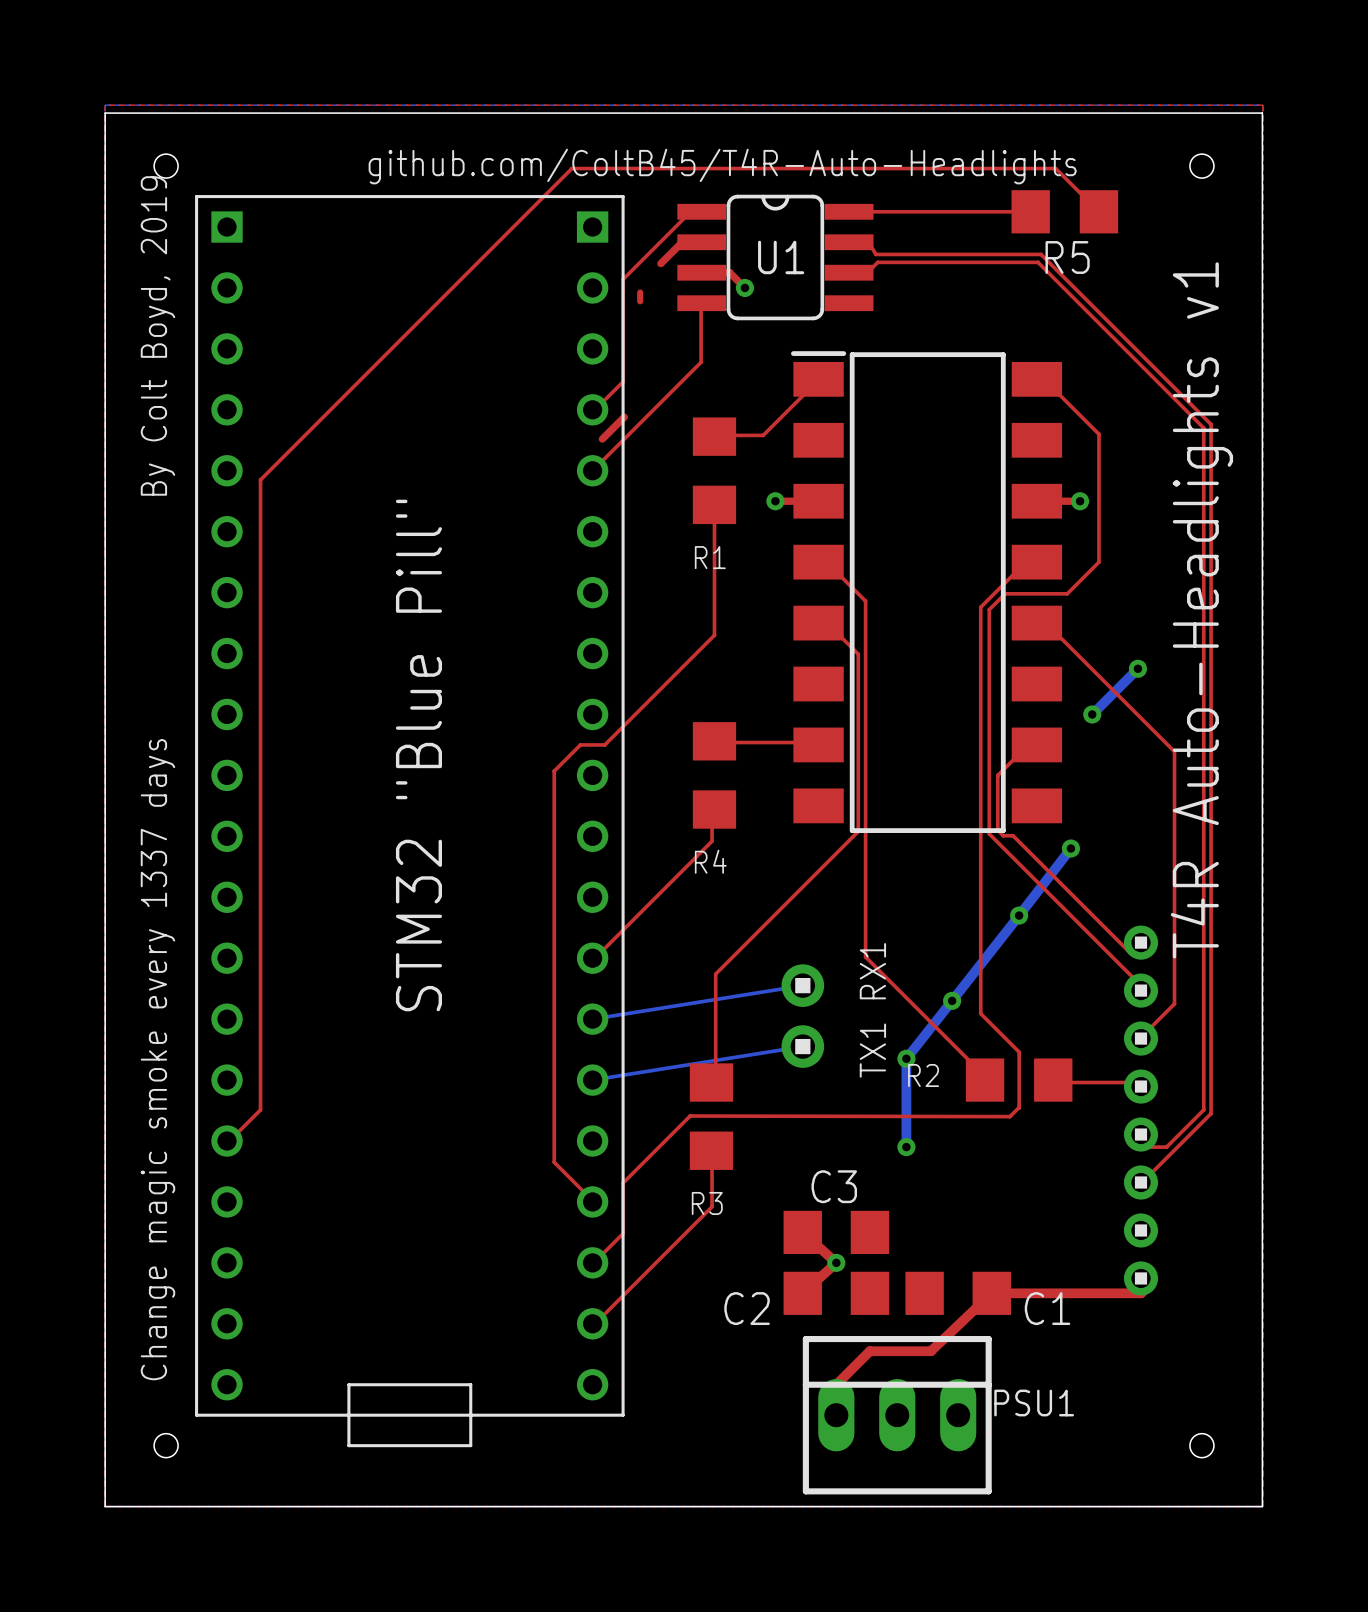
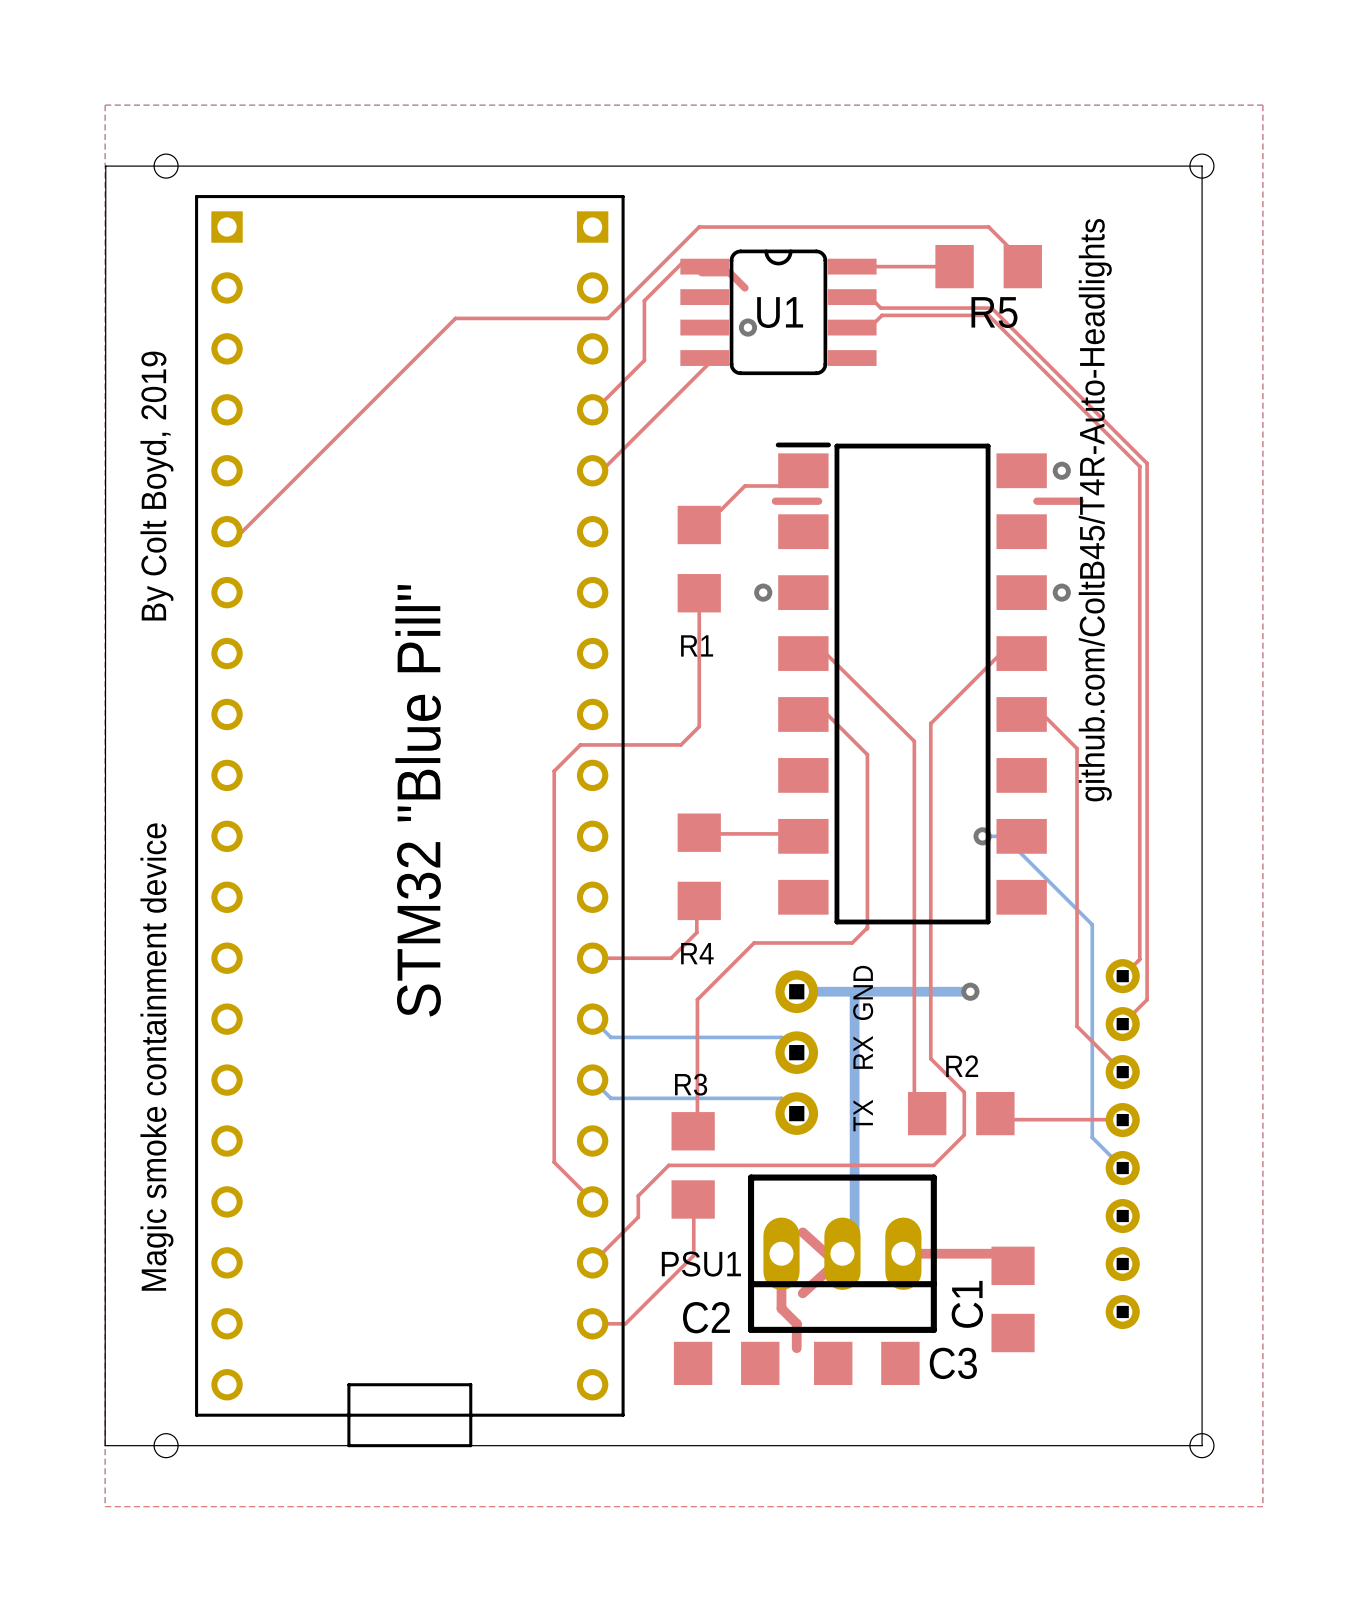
board edge: (105, 113) (1262, 113) (1262, 1506) (105, 1506) (105, 113) -> (105, 166) (105, 1445) (1202, 1445) (1202, 166) (105, 166)
text: github.com/ColtB45/T4R-Auto-Headlights (722, 166) -> none
top track: (701, 211) (690, 212) (623, 279) (623, 381) -> (704, 266) (686, 266) (682, 262) (644, 300) (644, 360) (623, 381)
top track: (849, 211) (1030, 211) -> none
R5 position: (1064, 211) -> (988, 266)
top track: (1098, 211) (1055, 168) (571, 168) (260, 479) (260, 1109) (229, 1141) (227, 1141) -> none
top track: (690, 242) (701, 242) (682, 242) (660, 263) -> none
top track: (849, 242) (868, 242) (875, 254) (1041, 254) (1211, 424) (1211, 1113) (1141, 1182) -> none
U1 position: (775, 257) -> (778, 312)
top track: none -> (852, 266) (954, 266)
top track: none -> (1022, 266) (1022, 261) (988, 227) (699, 227) (607, 318) (455, 318) (242, 531) (227, 531)
top track: (849, 272) (867, 272) (877, 262) (1038, 262) (1203, 428) (1203, 1109) (1166, 1147) (1144, 1147) (1144, 1137) (1141, 1134) -> none
via position: (744, 287) -> (747, 327)
top track: (640, 292) (640, 301) -> none
top track: none -> (852, 297) (858, 303) (875, 303) (880, 308) (991, 308) (1147, 463) (1147, 999) (1122, 1024)
top track: (701, 303) (701, 362) (592, 470) -> (704, 358) (709, 362) (601, 470) (592, 470)
top track: none -> (852, 327) (869, 327) (882, 315) (988, 315) (1139, 466) (1139, 959) (1122, 976)
text position: By Colt Boyd, 2019 (157, 335) -> By Colt Boyd, 2019 (156, 486)
top track: (818, 379) (763, 435) (714, 436) -> none
top track: (1036, 379) (1044, 379) (1098, 434) (1098, 562) (1067, 593) (1005, 593) (989, 609) (989, 833) (1141, 985) (1141, 990) -> none
top track: (624, 417) (602, 439) -> none
R1 position: (714, 470) -> (699, 559)
top track: none -> (803, 470) (788, 485) (744, 485) (720, 510) (713, 510) (699, 524)
via: (775, 501) -> none
via position: (1080, 501) -> (1061, 470)
top track: (712, 504) (714, 504) (714, 635) (604, 744) -> (696, 593) (699, 593) (699, 726) (680, 744) (604, 744)
top track: (818, 562) (831, 567) (865, 601) (865, 956) (982, 1073) (982, 1078) (985, 1080) -> none
top track: (1036, 562) (1018, 569) (980, 607) (980, 1013) (1019, 1052) (1019, 1108) -> none
text: none -> github.com/ColtB45/T4R-Auto-Headlights (1095, 510)
via: none -> (763, 592)
part position: (926, 592) -> (911, 683)
via: none -> (1061, 592)
text: T4R Auto-Headlights v1 (1201, 610) -> none
top track: (818, 623) (827, 623) (858, 654) (858, 831) (715, 974) (715, 1078) (711, 1082) -> none
top track: (1036, 623) (1045, 623) (1174, 751) (1174, 1003) (1141, 1038) -> none
top track: none -> (803, 653) (820, 648) (914, 741) (914, 1109) (918, 1113) (927, 1113)
bottom track: (1137, 668) (1092, 714) -> none
via: (1137, 668) -> none
top track: none -> (803, 714) (827, 714) (867, 754) (867, 928)
top track: none -> (1021, 714) (1042, 714) (1077, 748) (1077, 1026) (1122, 1072)
via: (1092, 714) -> none
top track: (714, 741) (818, 742) (818, 744) -> (699, 832) (802, 833) (803, 836)
top track: (1037, 748) (1025, 748) (997, 775) (997, 830) (1003, 835) (1013, 835) (1130, 953) (1141, 942) -> none
R4 position: (714, 775) -> (699, 866)
top track: (714, 809) (712, 811) (712, 841) (595, 958) -> (699, 900) (696, 903) (696, 932) (671, 958) (595, 958)
bottom track: none -> (982, 836) (1003, 836) (1092, 924) (1092, 1137) (1122, 1168)
via: none -> (982, 836)
bottom track: (1070, 848) (906, 1058) (906, 1147) -> none
via: (1070, 848) -> none
via: (1019, 915) -> none
top track: none -> (867, 927) (852, 942) (754, 942) (697, 999) (697, 1126) (693, 1131)
bottom track: (802, 985) (592, 1019) -> (796, 1052) (781, 1037) (610, 1037) (592, 1019)
bottom track: none -> (796, 991) (970, 991)
bottom track: none -> (854, 991) (854, 1241) (842, 1253)
via position: (952, 1000) -> (970, 991)
text: TX1 RX1 (872, 1010) -> none
text: none -> Magic smoke containment device (156, 1057)
part: (802, 1016) -> none
text: none -> TX RX GND (863, 1048)
bottom track: (802, 1046) (592, 1080) -> (796, 1113) (781, 1098) (610, 1098) (592, 1080)
part: none -> (796, 1052)
via: (906, 1058) -> none
text: Change magic smoke every 1337 days (157, 1059) -> none
R2 name position: R2 (923, 1075) -> R2 (962, 1066)
R2 position: (1019, 1080) -> (961, 1113)
top track: (1053, 1080) (1055, 1082) (1136, 1082) (1141, 1086) -> none
top track: (1019, 1107) (1010, 1116) (690, 1116) (623, 1183) (623, 1233) (592, 1262) -> (1021, 653) (1000, 653) (930, 723) (930, 1058) (964, 1092) (964, 1134) (933, 1165) (668, 1165) (638, 1195) (638, 1217) (592, 1262)
part position: (1141, 1110) -> (1122, 1144)
top track: none -> (995, 1113) (1001, 1119) (1122, 1120)
R3 position: (711, 1116) -> (693, 1165)
via: (906, 1147) -> none
top track: (711, 1150) (712, 1206) (595, 1323) -> (693, 1199) (693, 1255) (625, 1323) (595, 1323)
C3 name position: C3 (834, 1186) -> C3 (953, 1363)
R3 name position: R3 (707, 1203) -> R3 (691, 1084)
C3 position: (836, 1232) -> (866, 1363)
top track: none -> (781, 1253) (781, 1308) (796, 1323) (796, 1348)
top track: none -> (903, 1253) (1000, 1253) (1013, 1265)
via: (836, 1262) -> none
top track: (1141, 1278) (1141, 1287) (1144, 1290) (1141, 1293) (991, 1293) (930, 1351) (869, 1351) (836, 1384) (836, 1415) -> none
C2 position: (836, 1293) -> (726, 1363)
C1 rotation: 0° (958, 1293) -> 90° clockwise (1013, 1299)
C2 name position: C2 (747, 1308) -> C2 (706, 1317)
C1 name position: C1 (1047, 1308) -> C1 (967, 1304)
PSU1 rotation: 0° (897, 1415) -> 180° (842, 1253)
PSU1 position: (897, 1415) -> (842, 1253)

